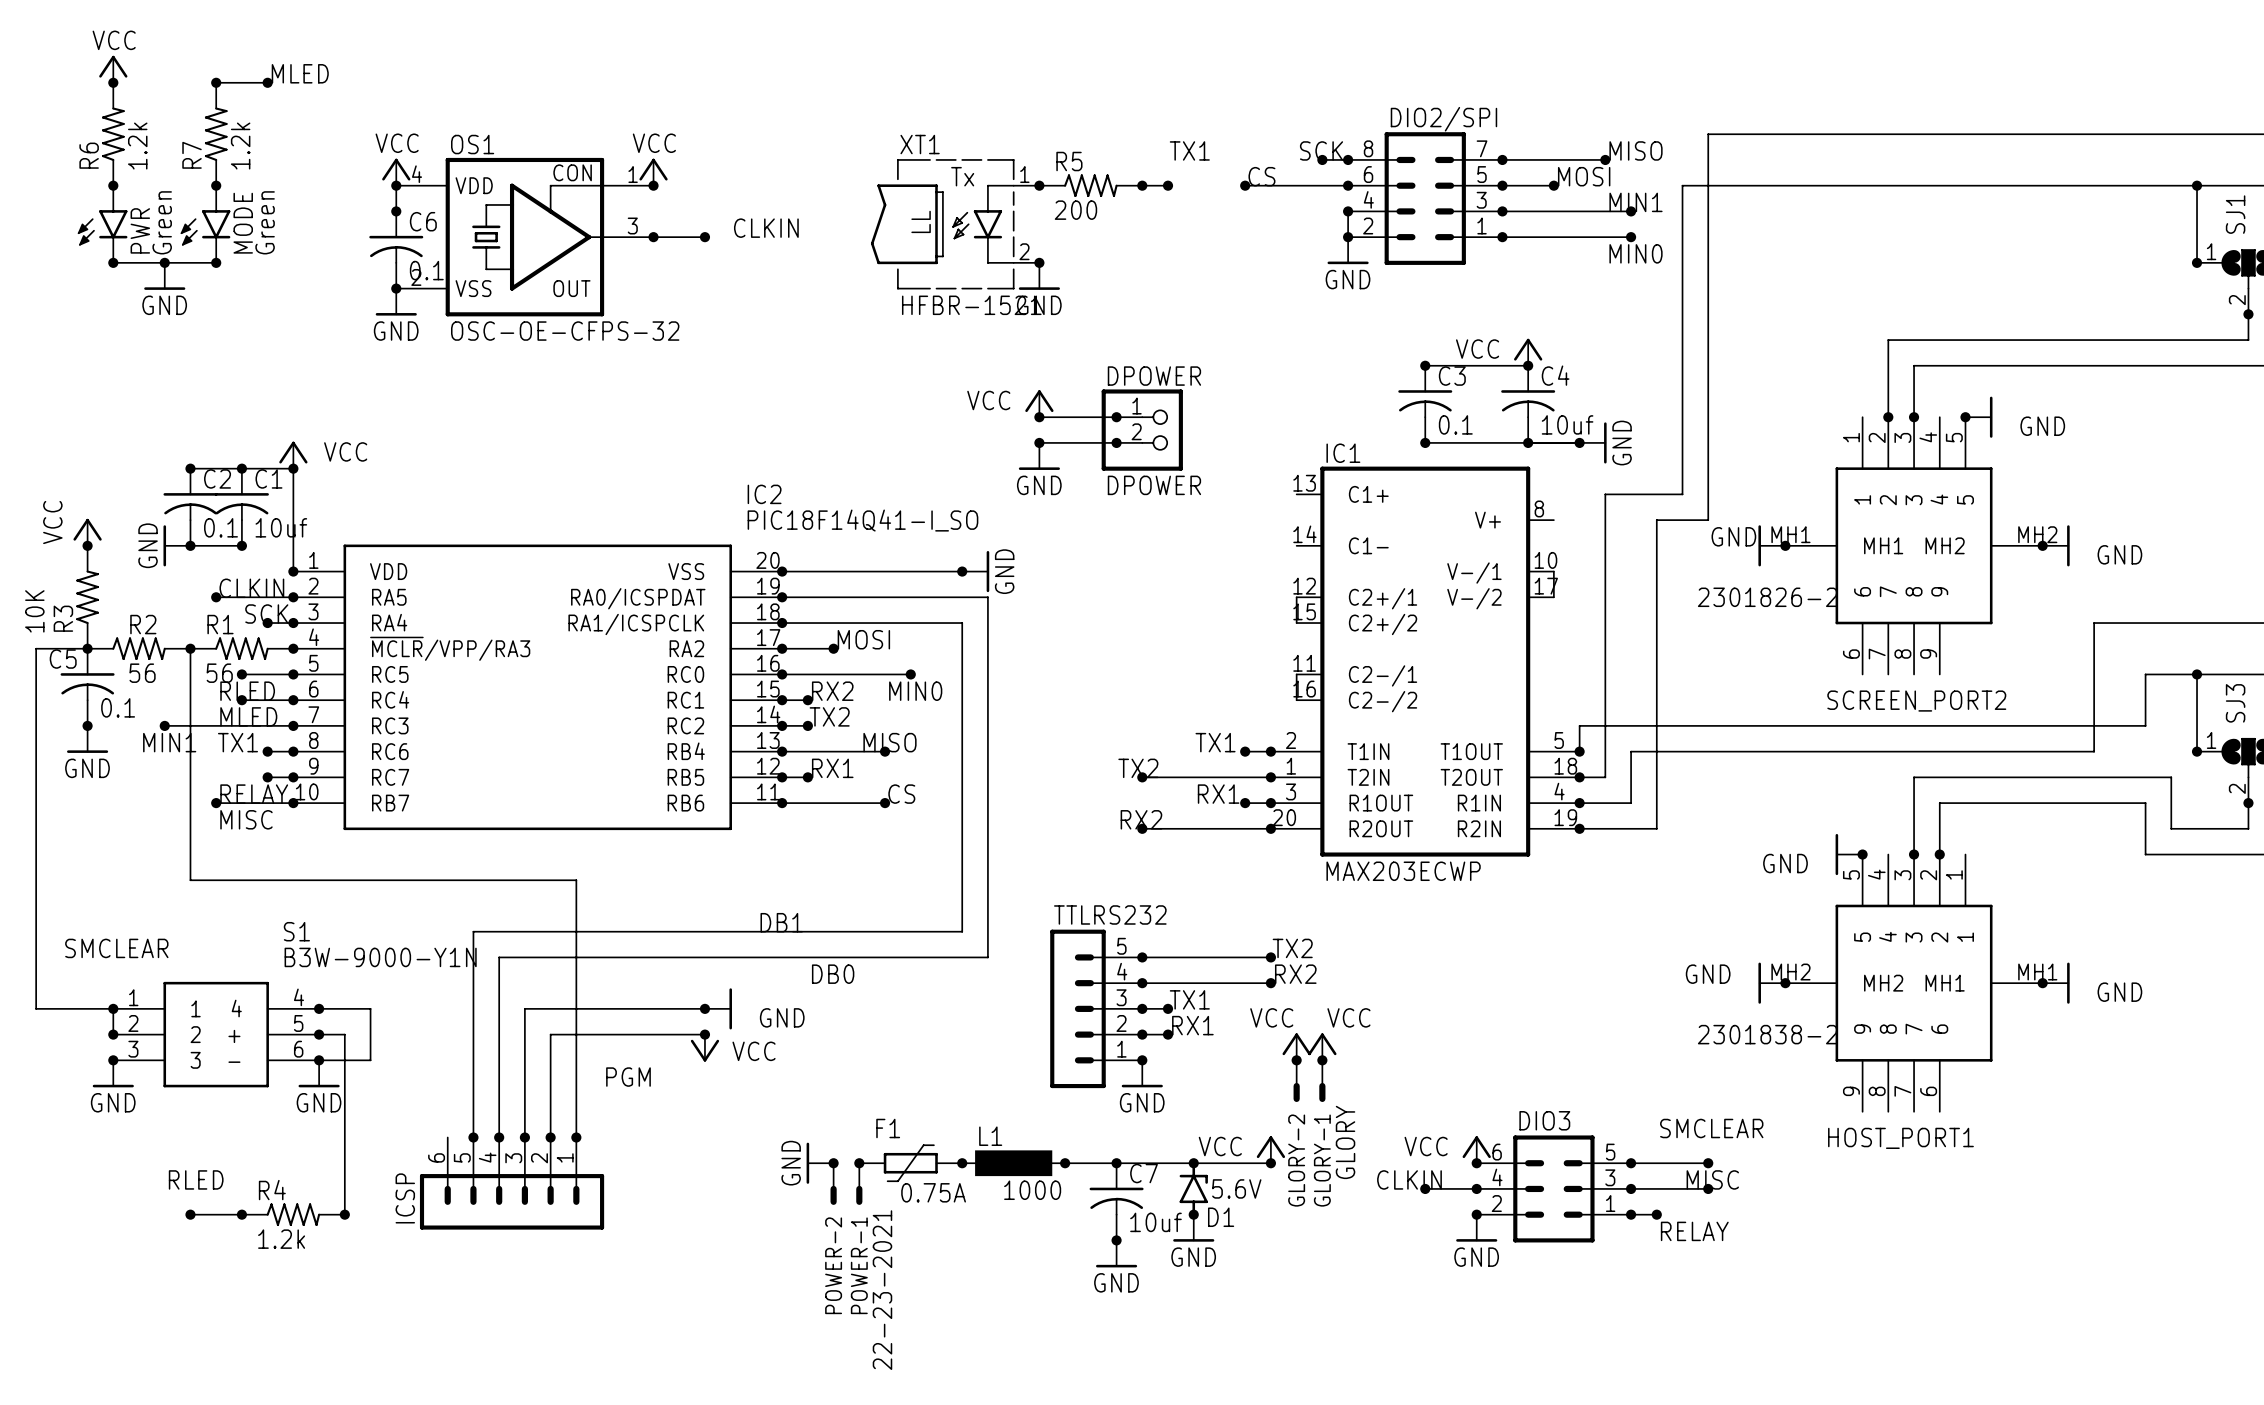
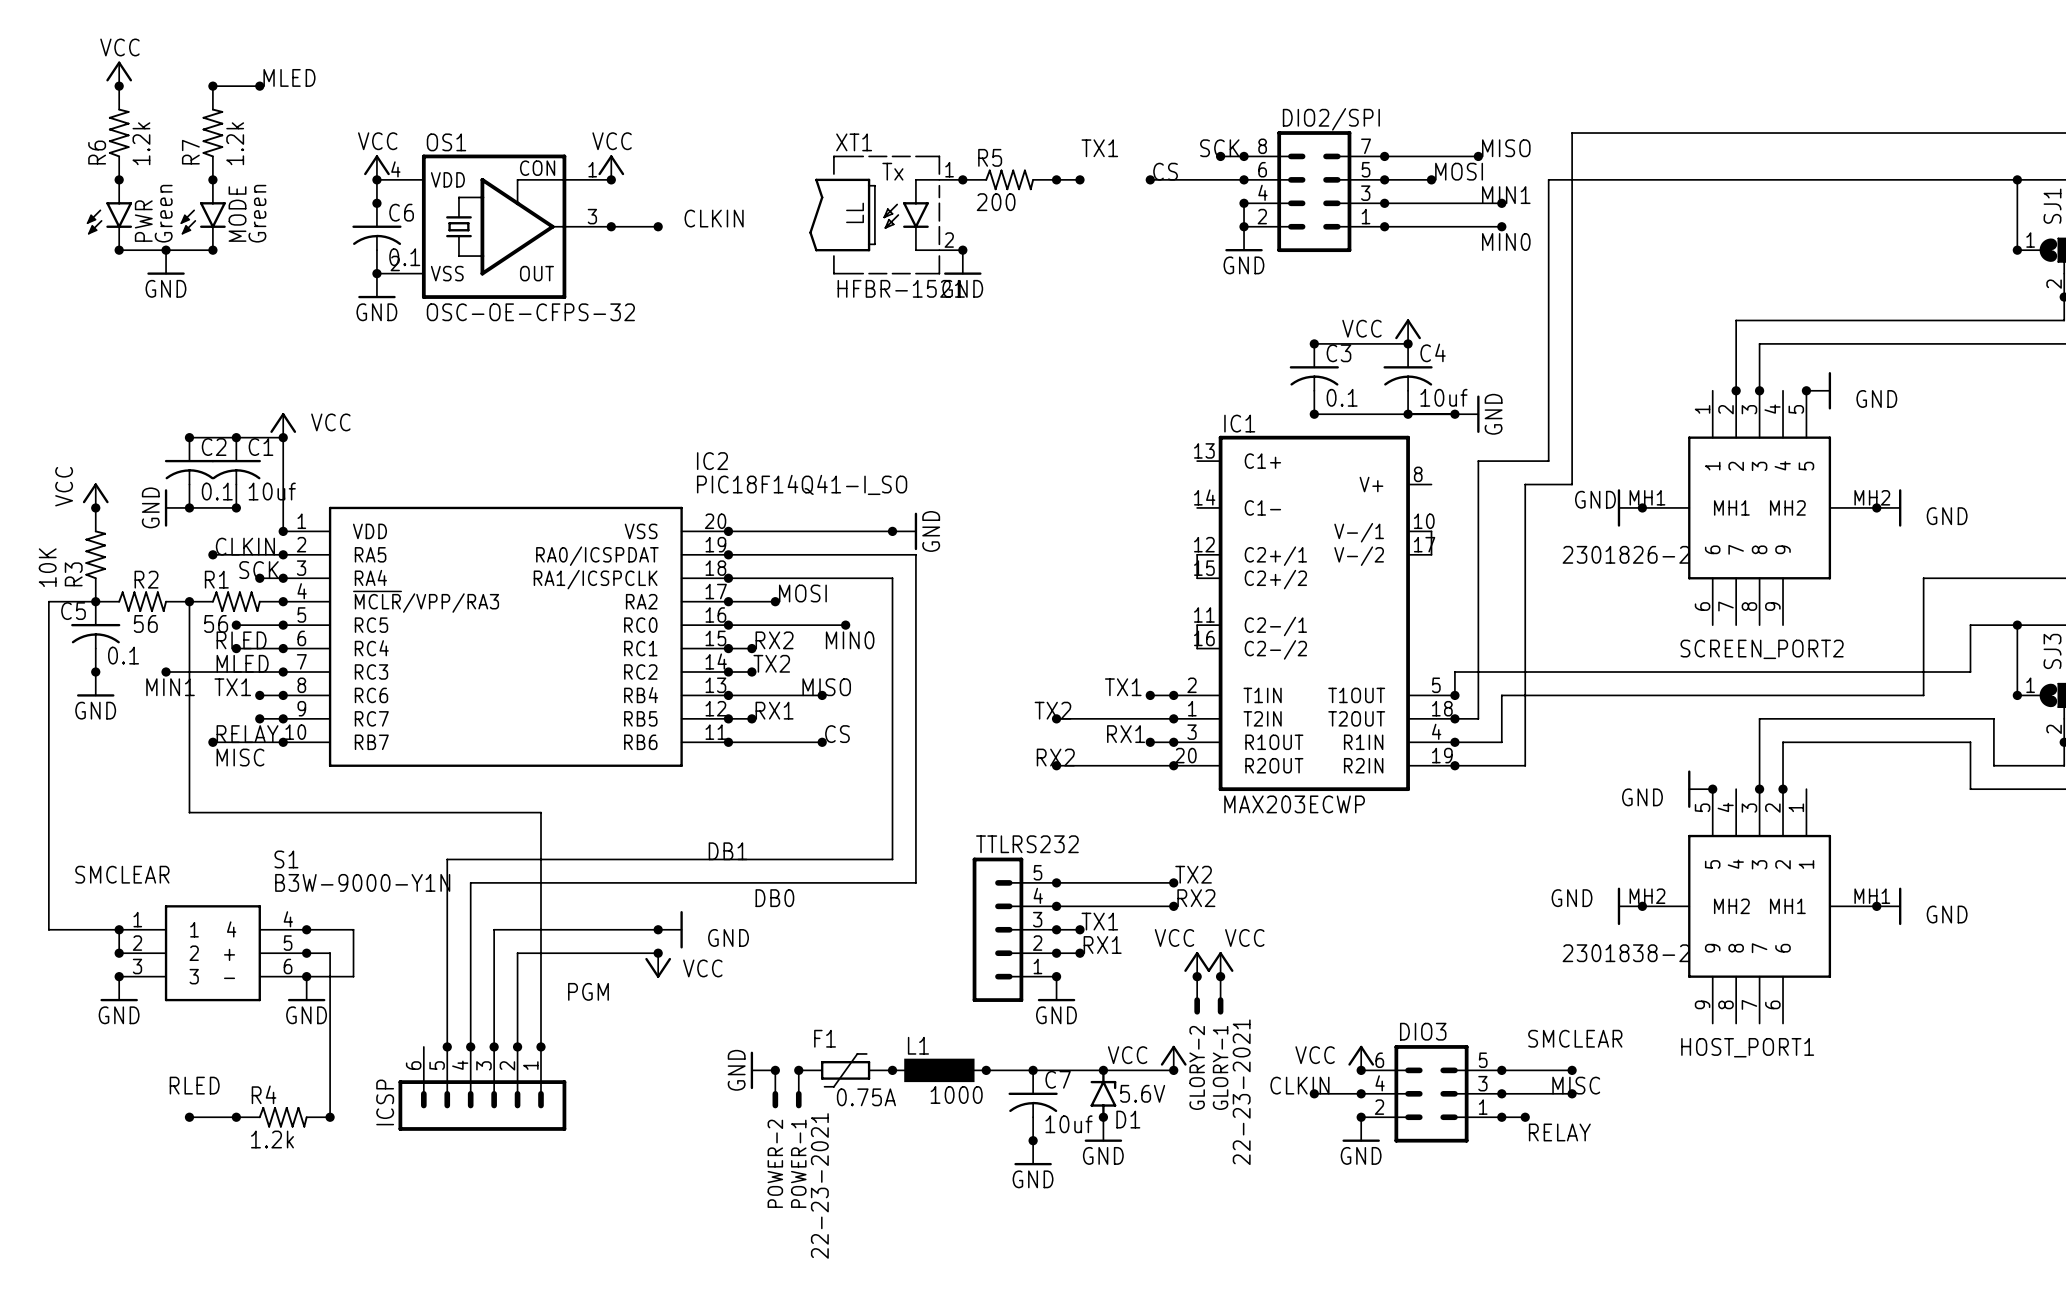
power symbol: VCC (1039, 403) -> none
wire: (1039, 417) (1142, 417) -> none
junction: (1039, 417) -> none
junction: (1116, 417) -> none
DPOWER: DPOWER (1142, 430) -> none
wire: (1039, 442) (1142, 442) -> none
junction: (1039, 442) -> none
junction: (1116, 442) -> none
power symbol: GND (1039, 456) -> none
GLORY-1 value: GLORY (1345, 1142) -> 22-23-2021 (1241, 1092)

